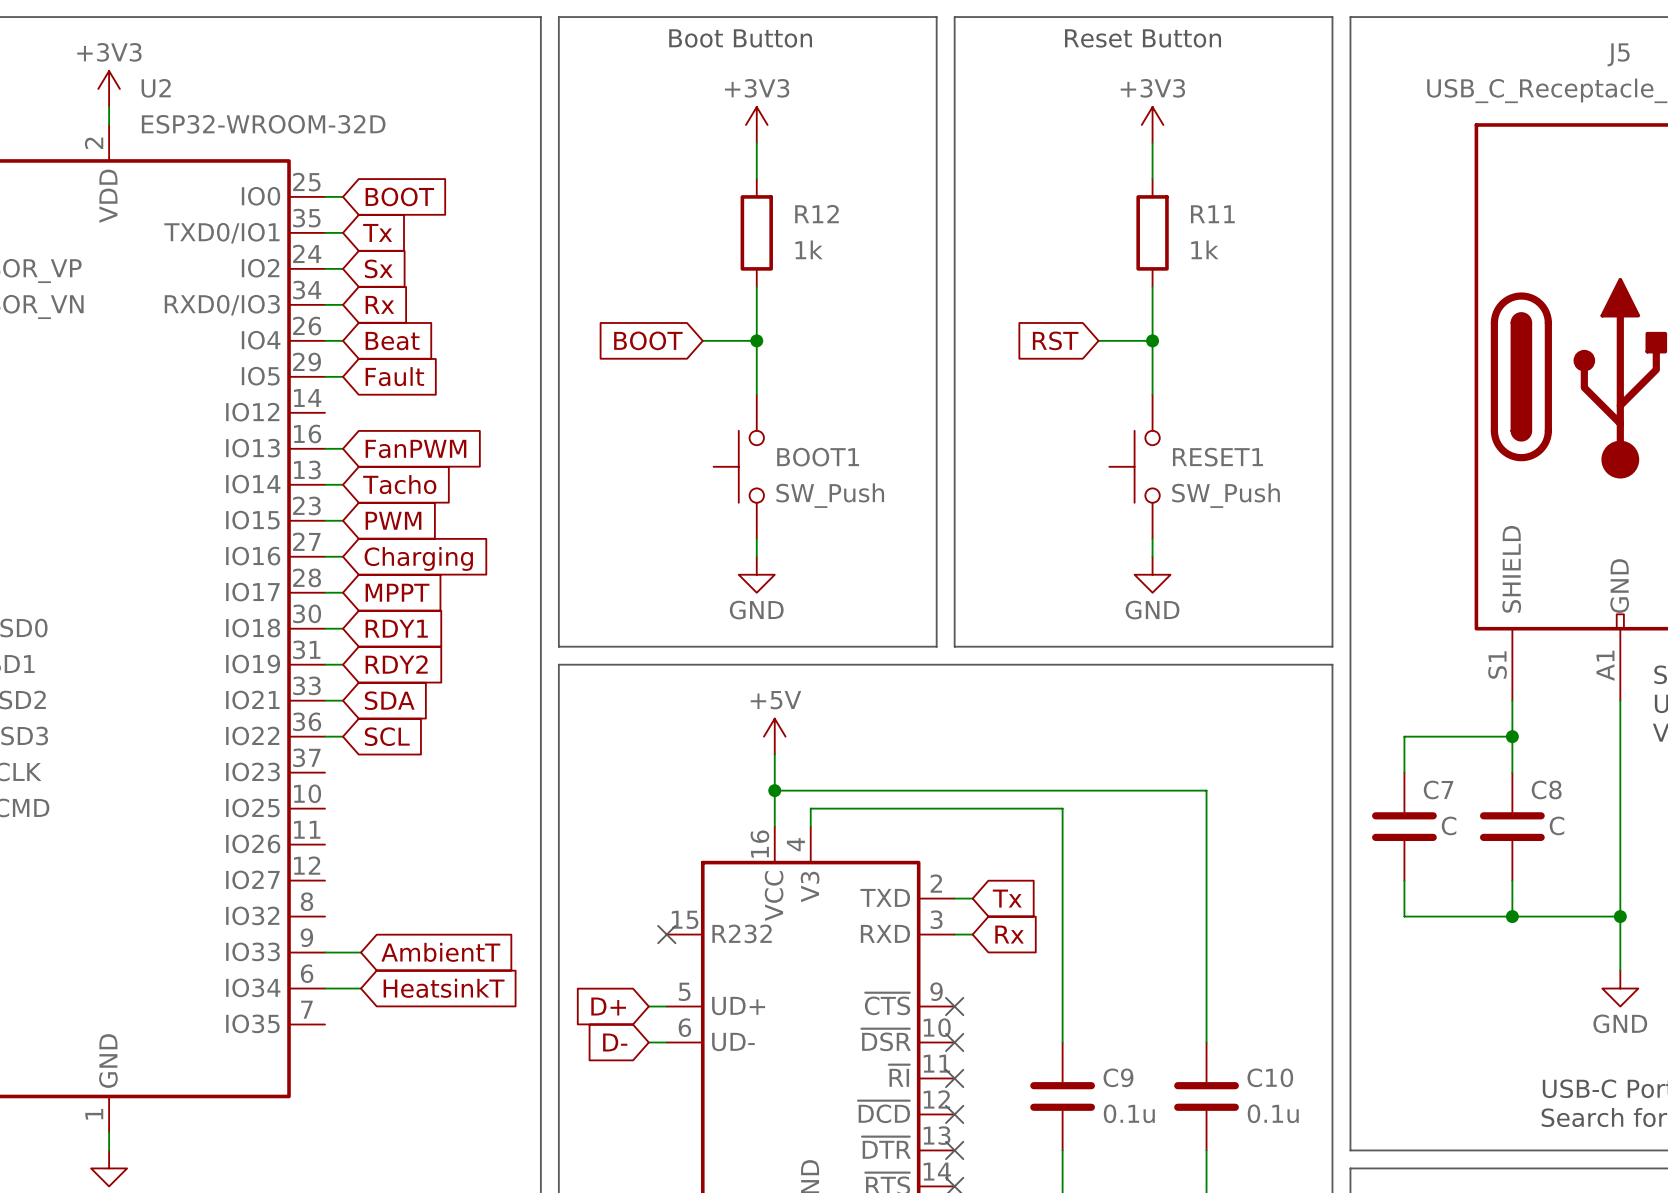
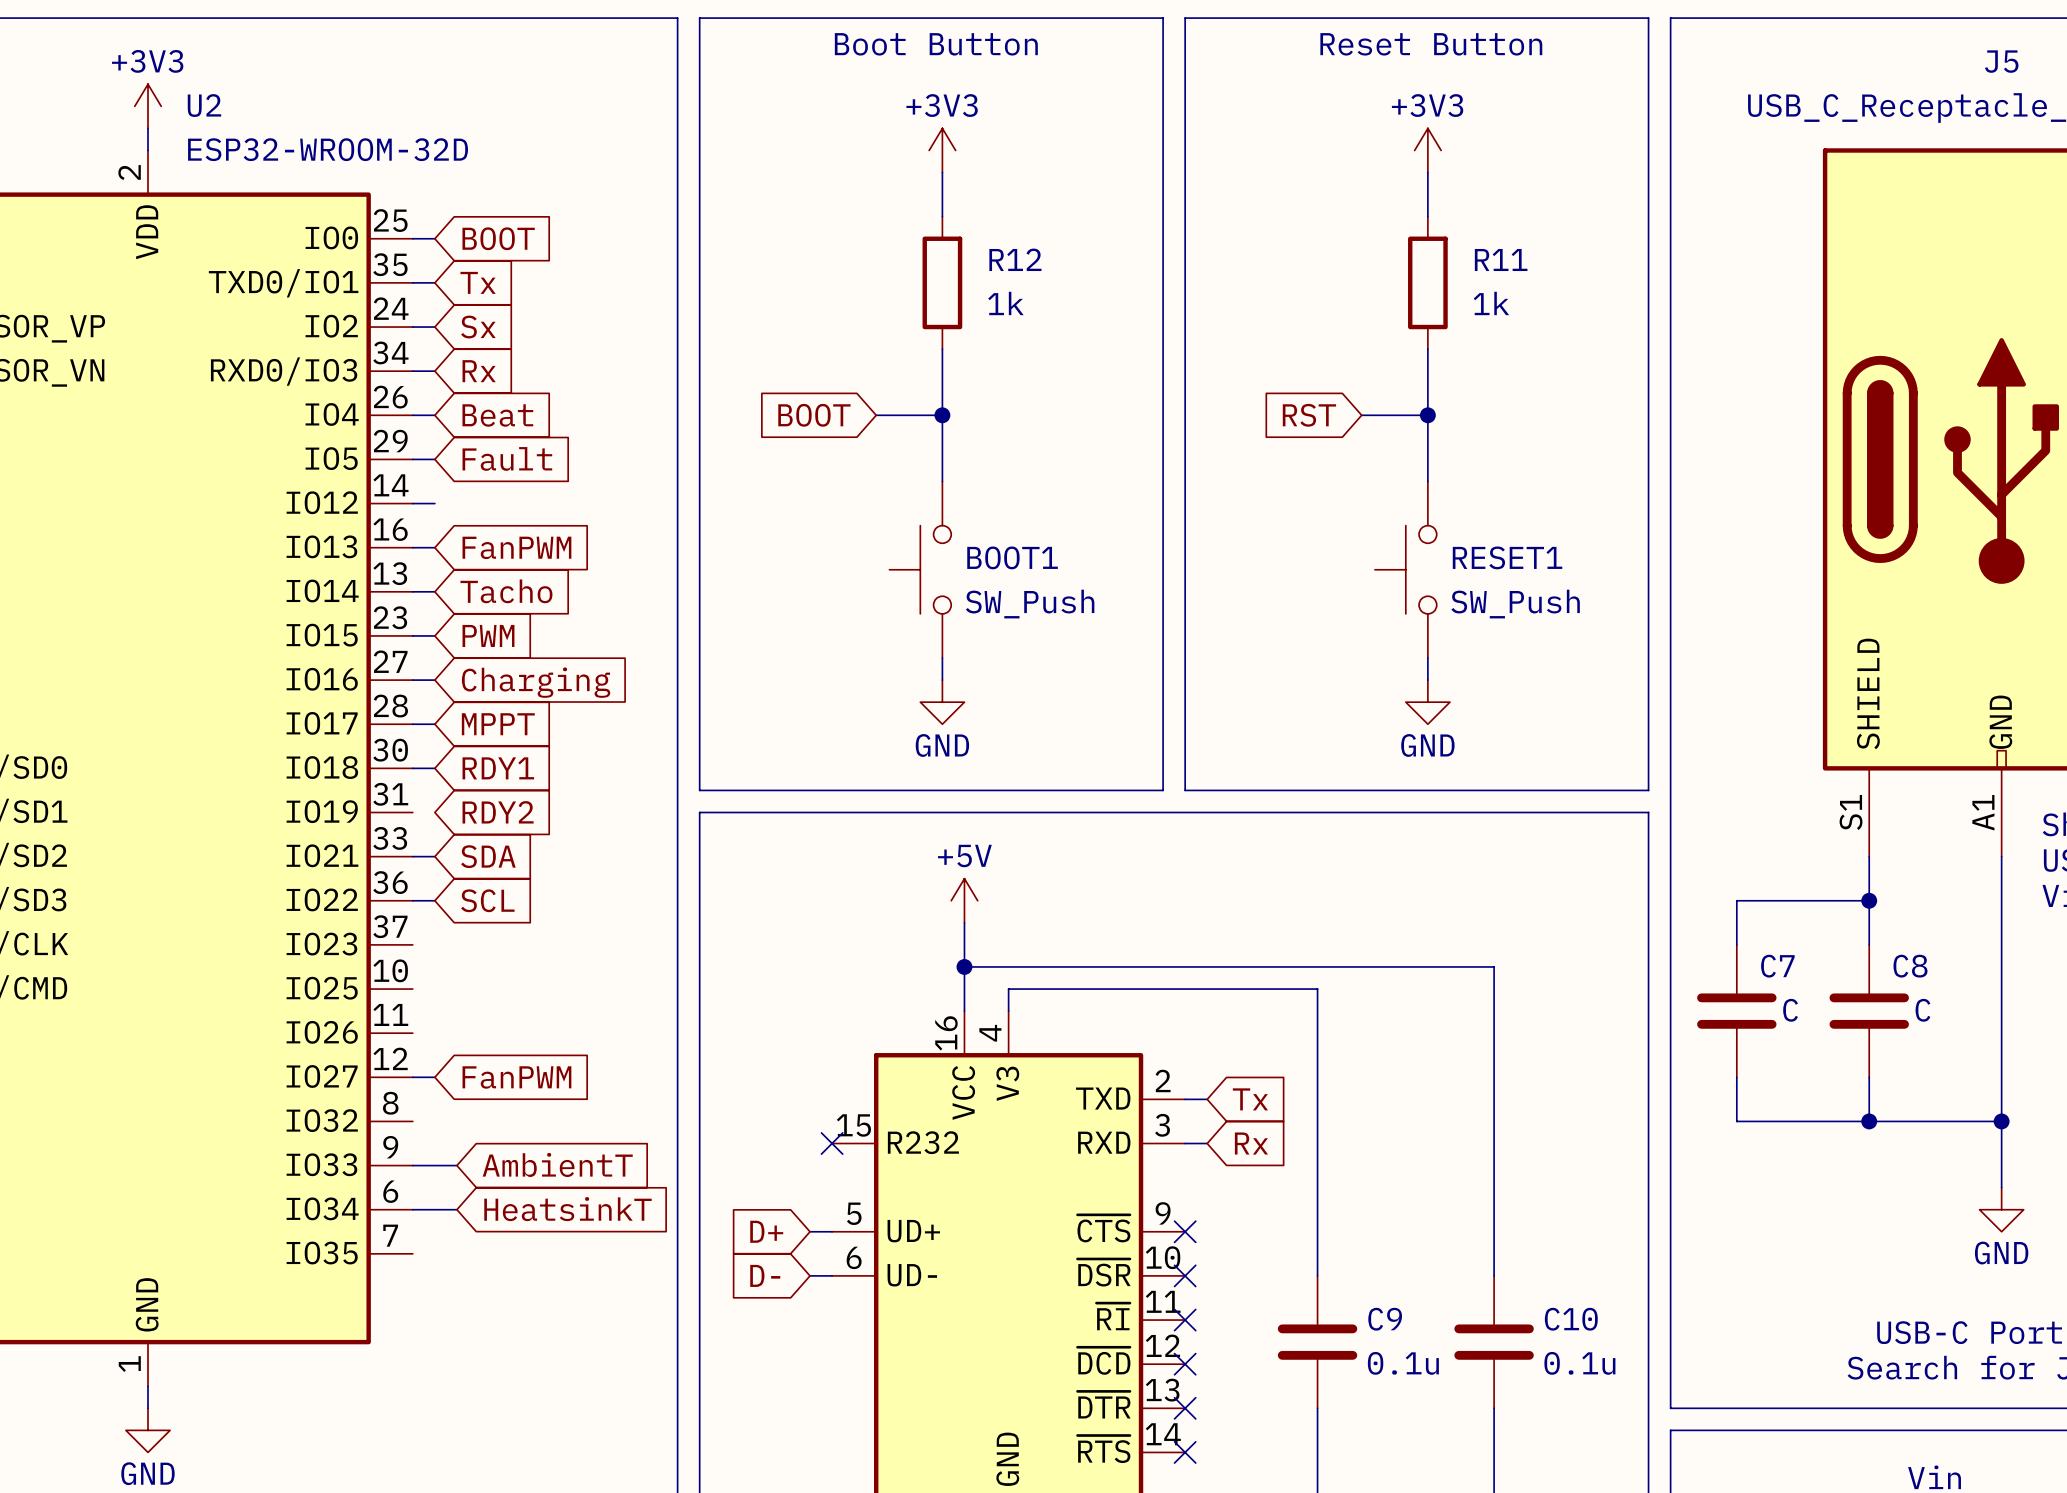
wire: none -> (412, 503) (434, 503)
wire: (324, 664) (342, 664) -> (412, 1077) (434, 1077)
global label: none -> FanPWM (516, 1077)

